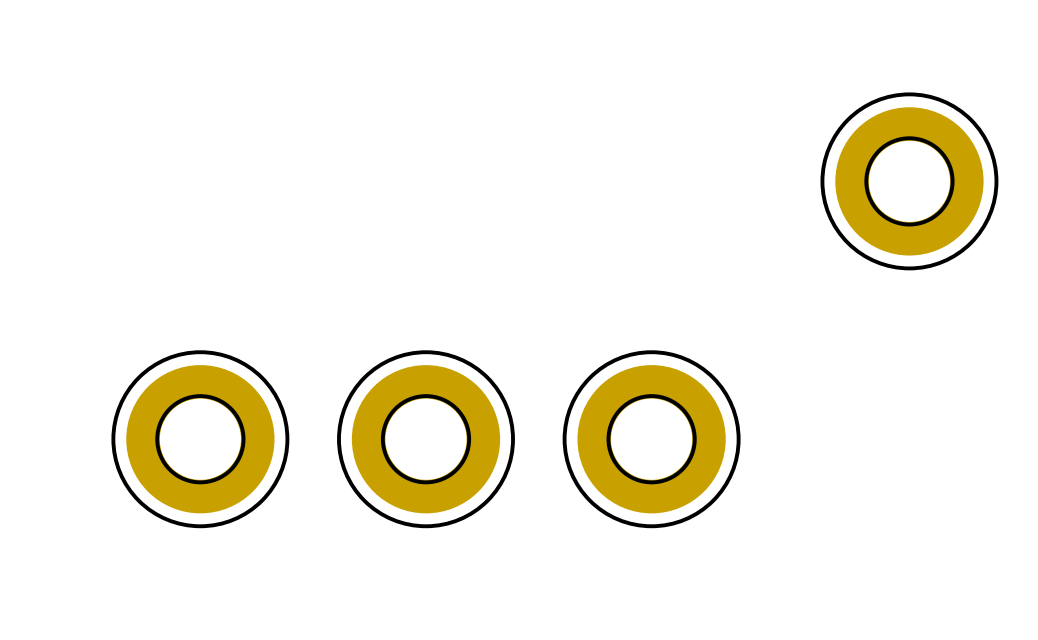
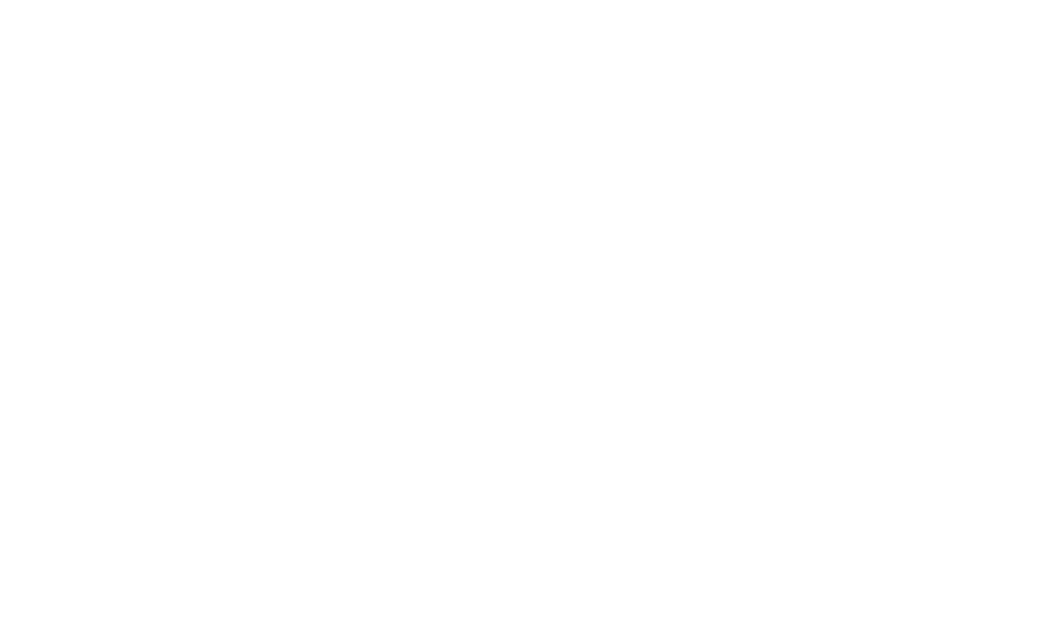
part: (909, 181) -> none
part: (200, 439) -> none
part: (426, 439) -> none
part: (651, 439) -> none

